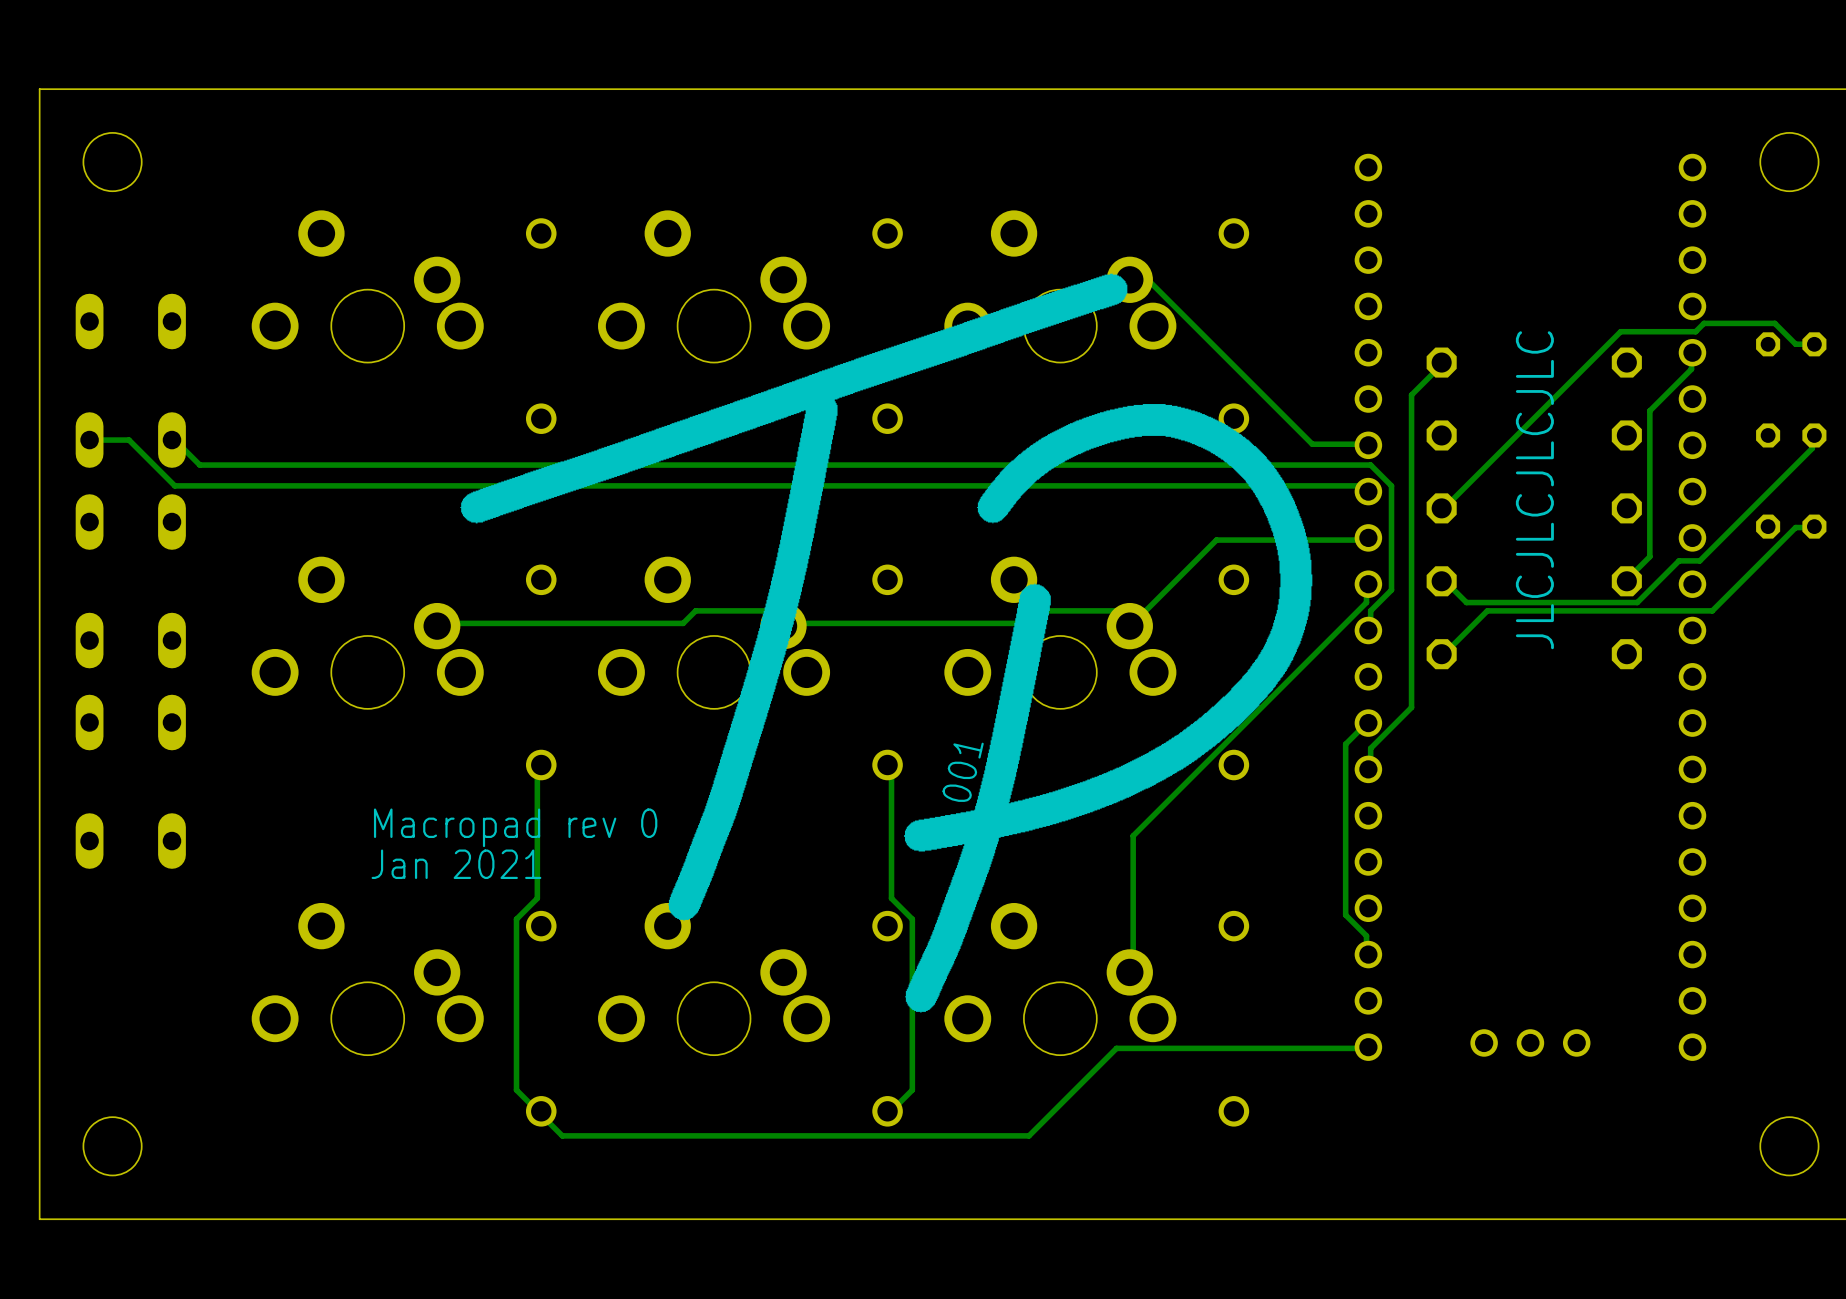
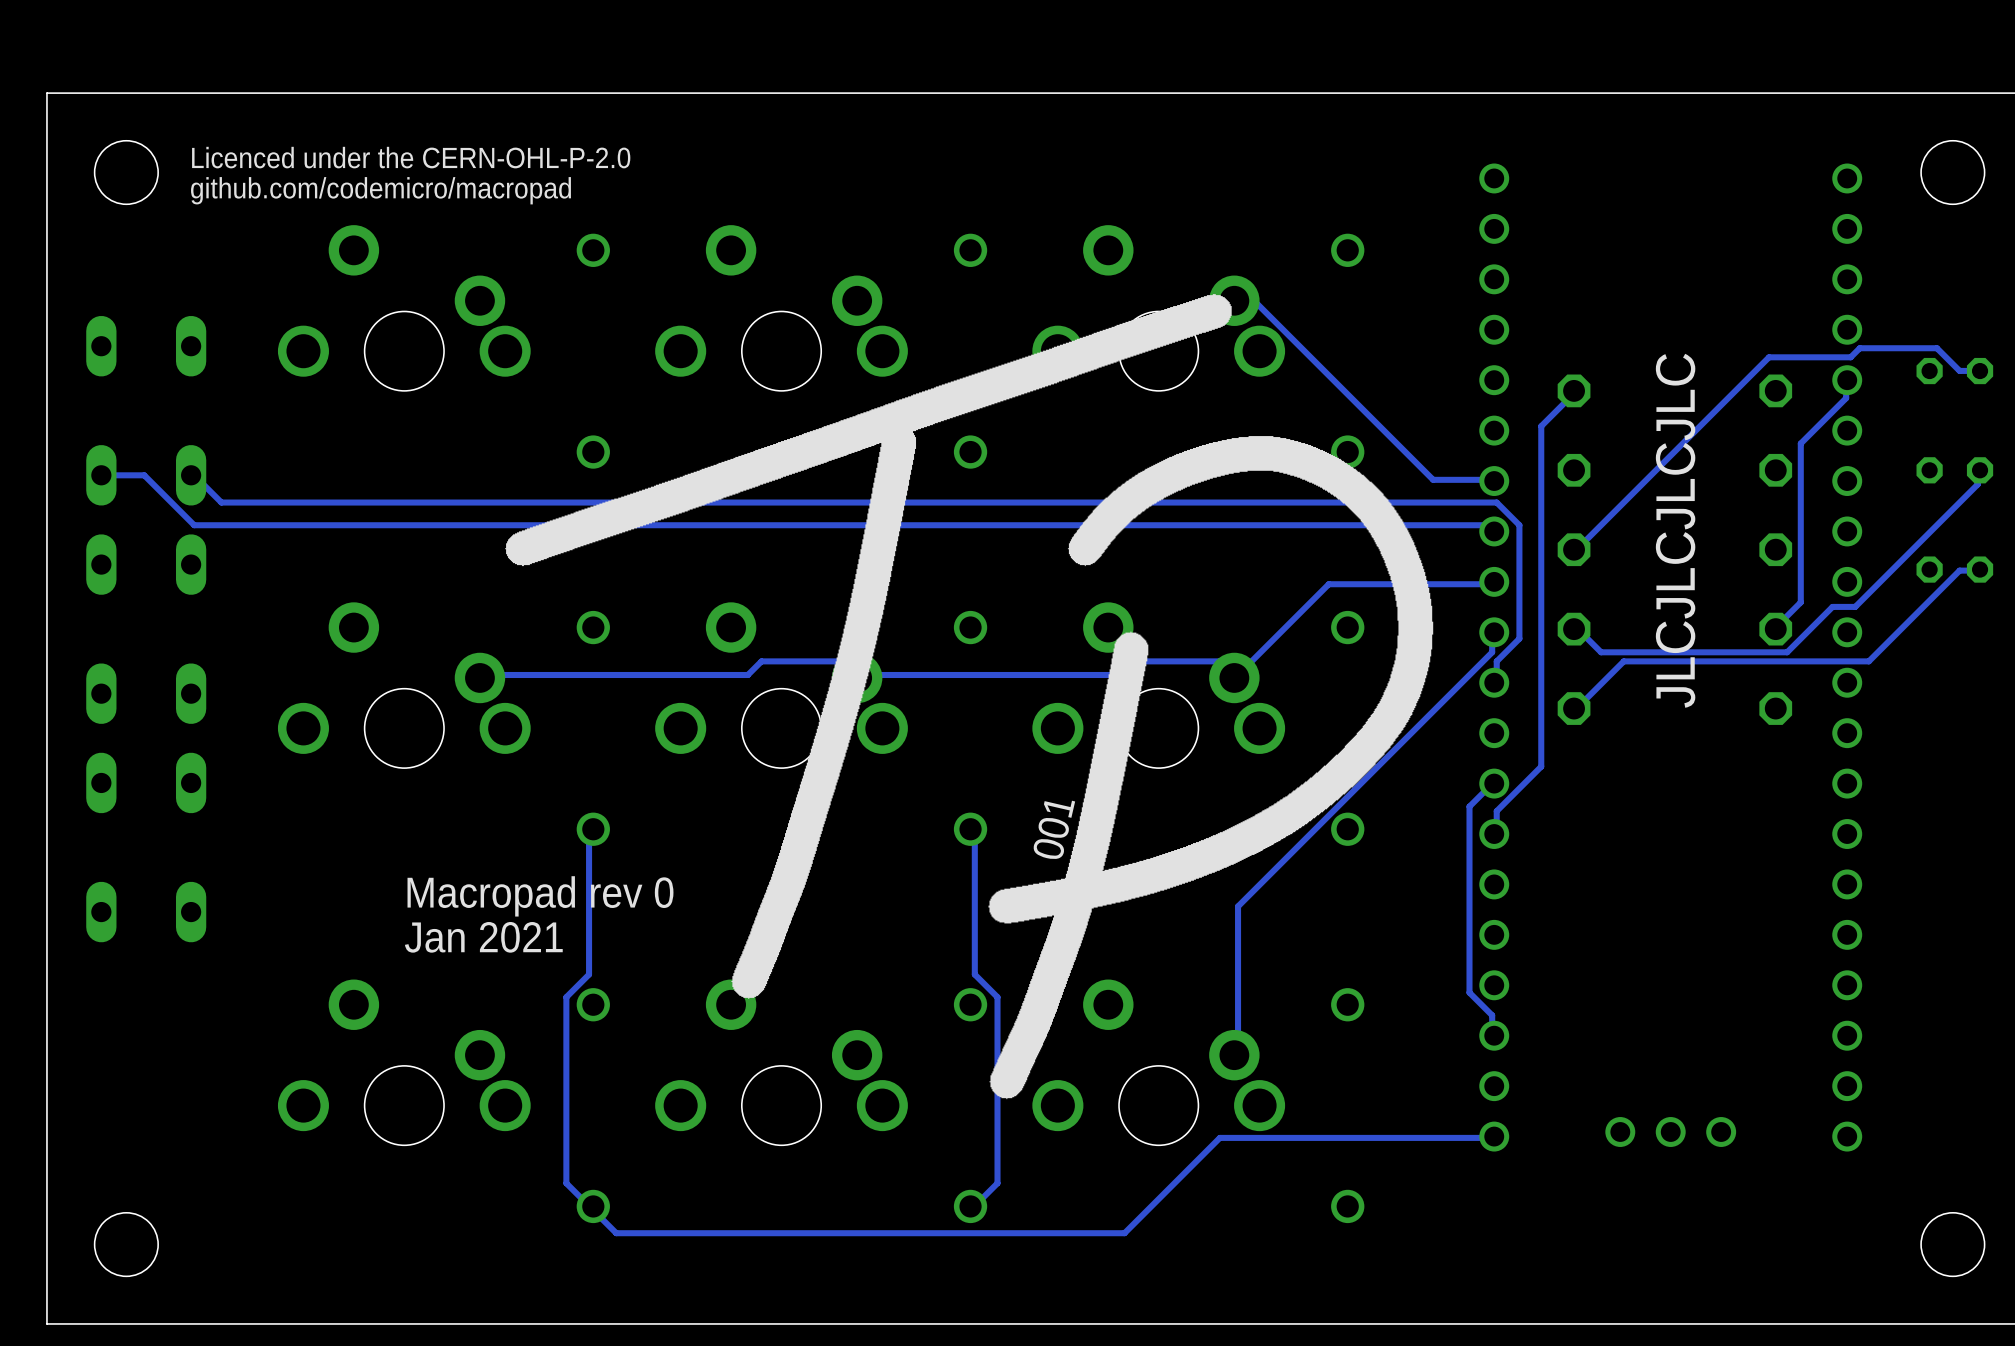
text: none -> Licenced under the CERN-OHL-P-2.0 (411, 157)
text: none -> github.com/codemicro/macropad (381, 190)

